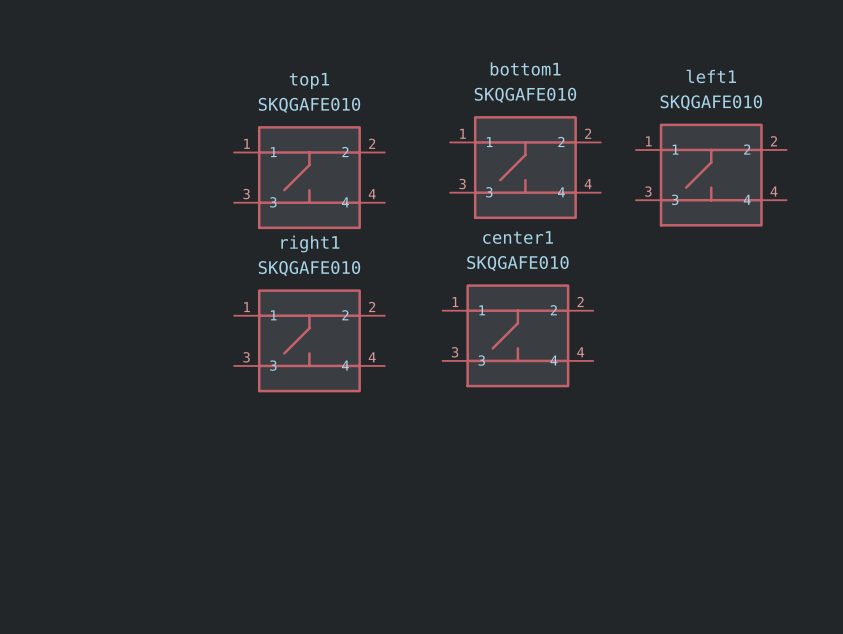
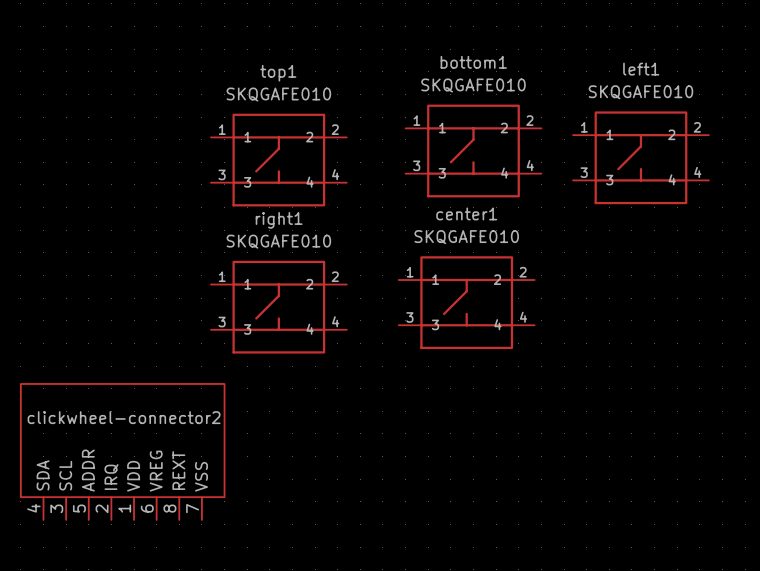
clickwheel-connector2: none -> (122, 451)

